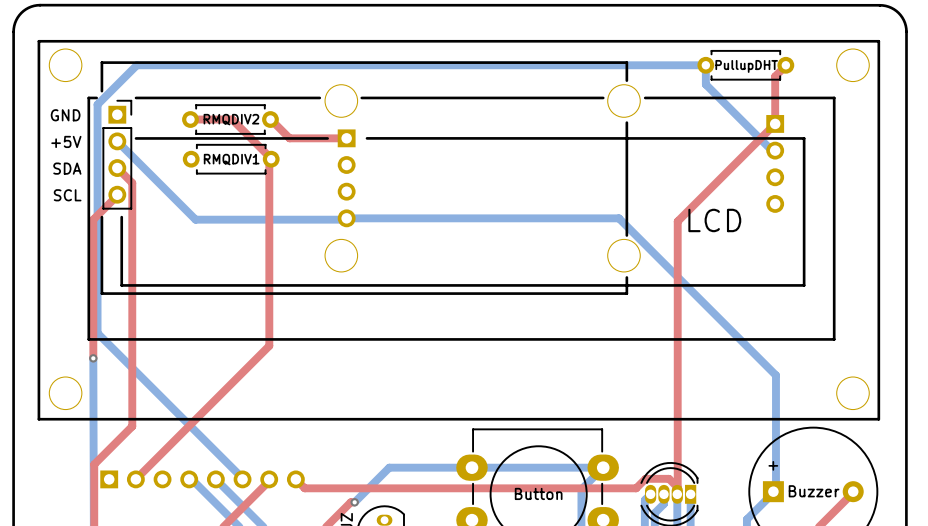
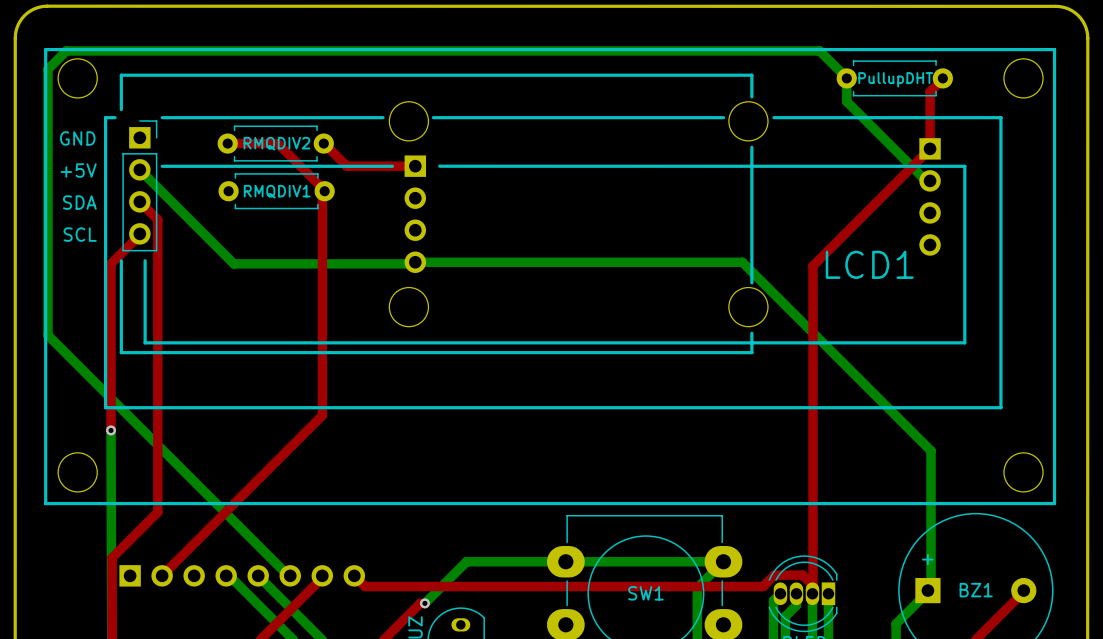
bottom track: (705, 65) (136, 65) (97, 104) (97, 333) (242, 478) -> none
bottom track: none -> (847, 78) (819, 50) (66, 50) (47, 69) (47, 335) (289, 577)
part value: LCD (714, 220) -> LCD1 (869, 264)
Buzzer name: Buzzer (814, 491) -> BZ1 (976, 590)
Button name: Button (538, 493) -> SW1 (645, 593)

